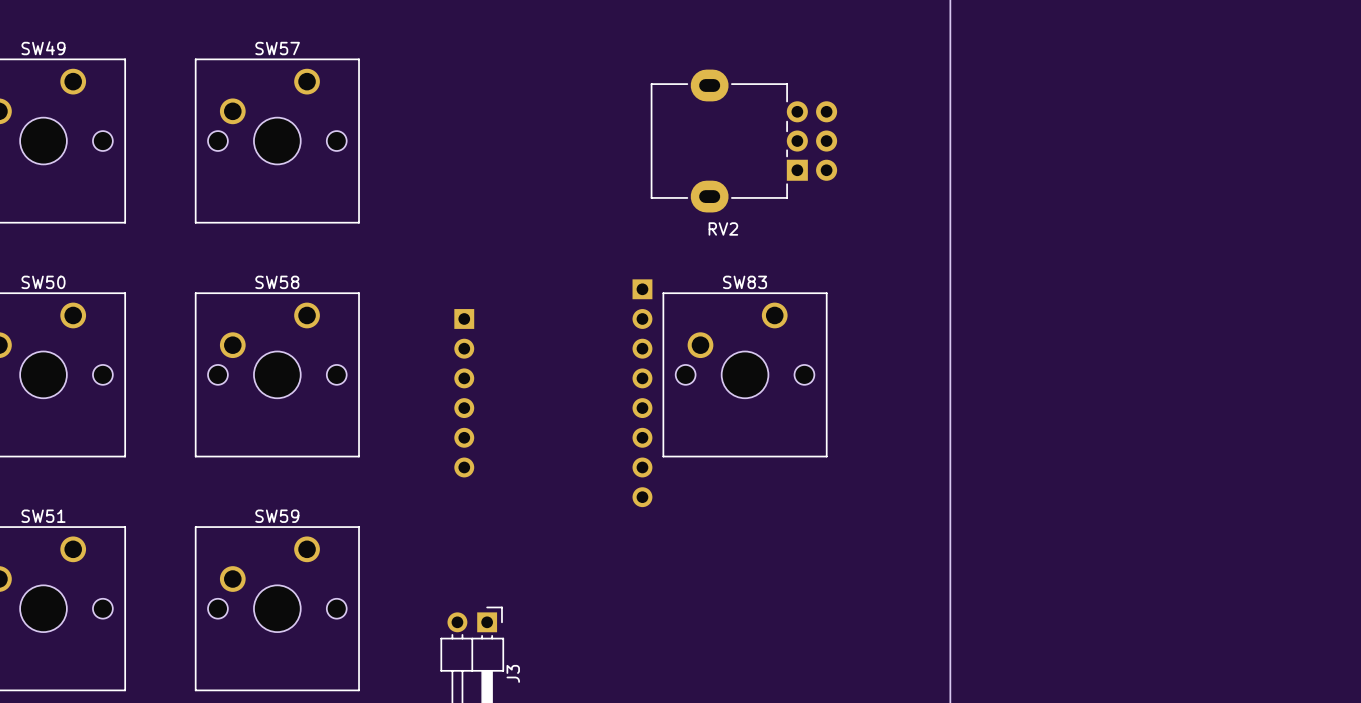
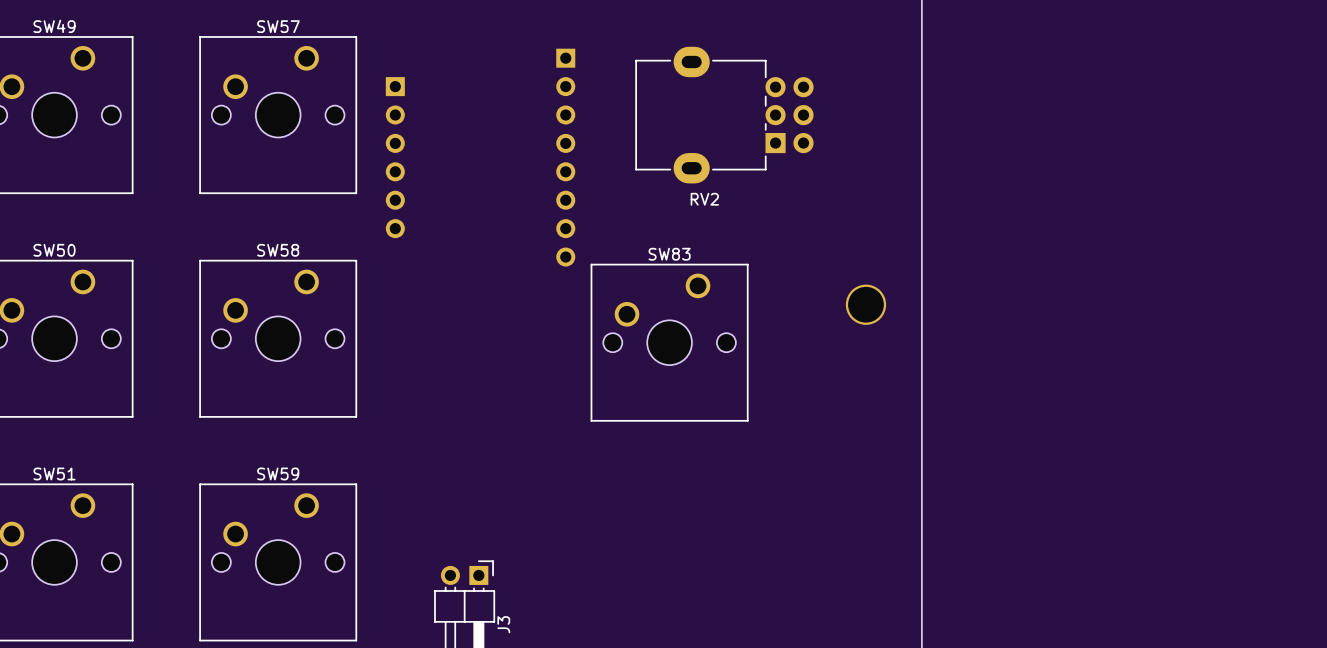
part: none -> (865, 304)
SW83 position: (745, 374) -> (669, 342)
part position: (464, 393) -> (395, 157)
part position: (642, 393) -> (565, 157)

